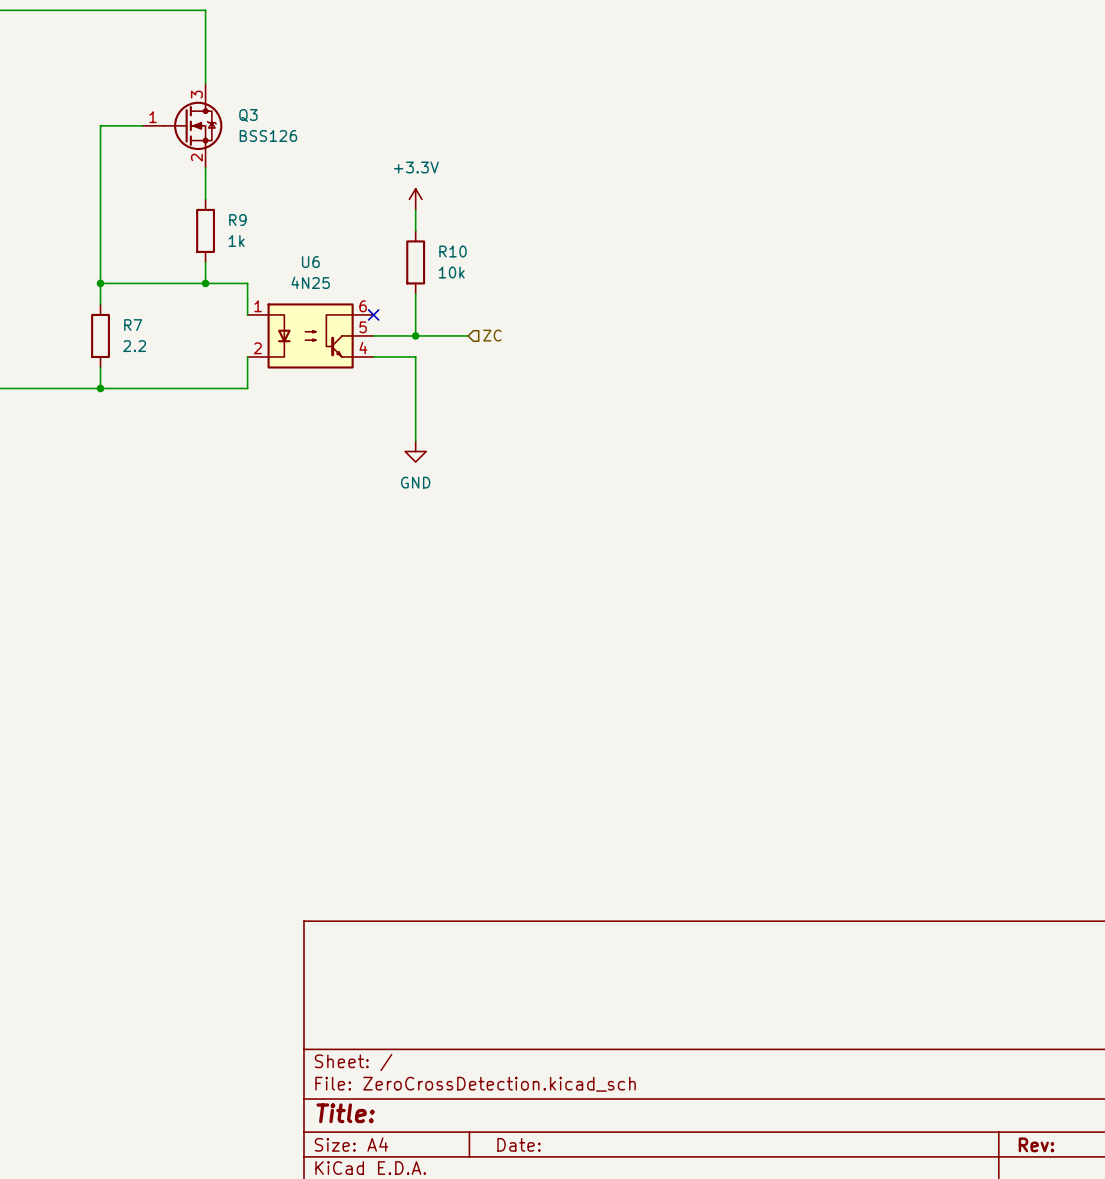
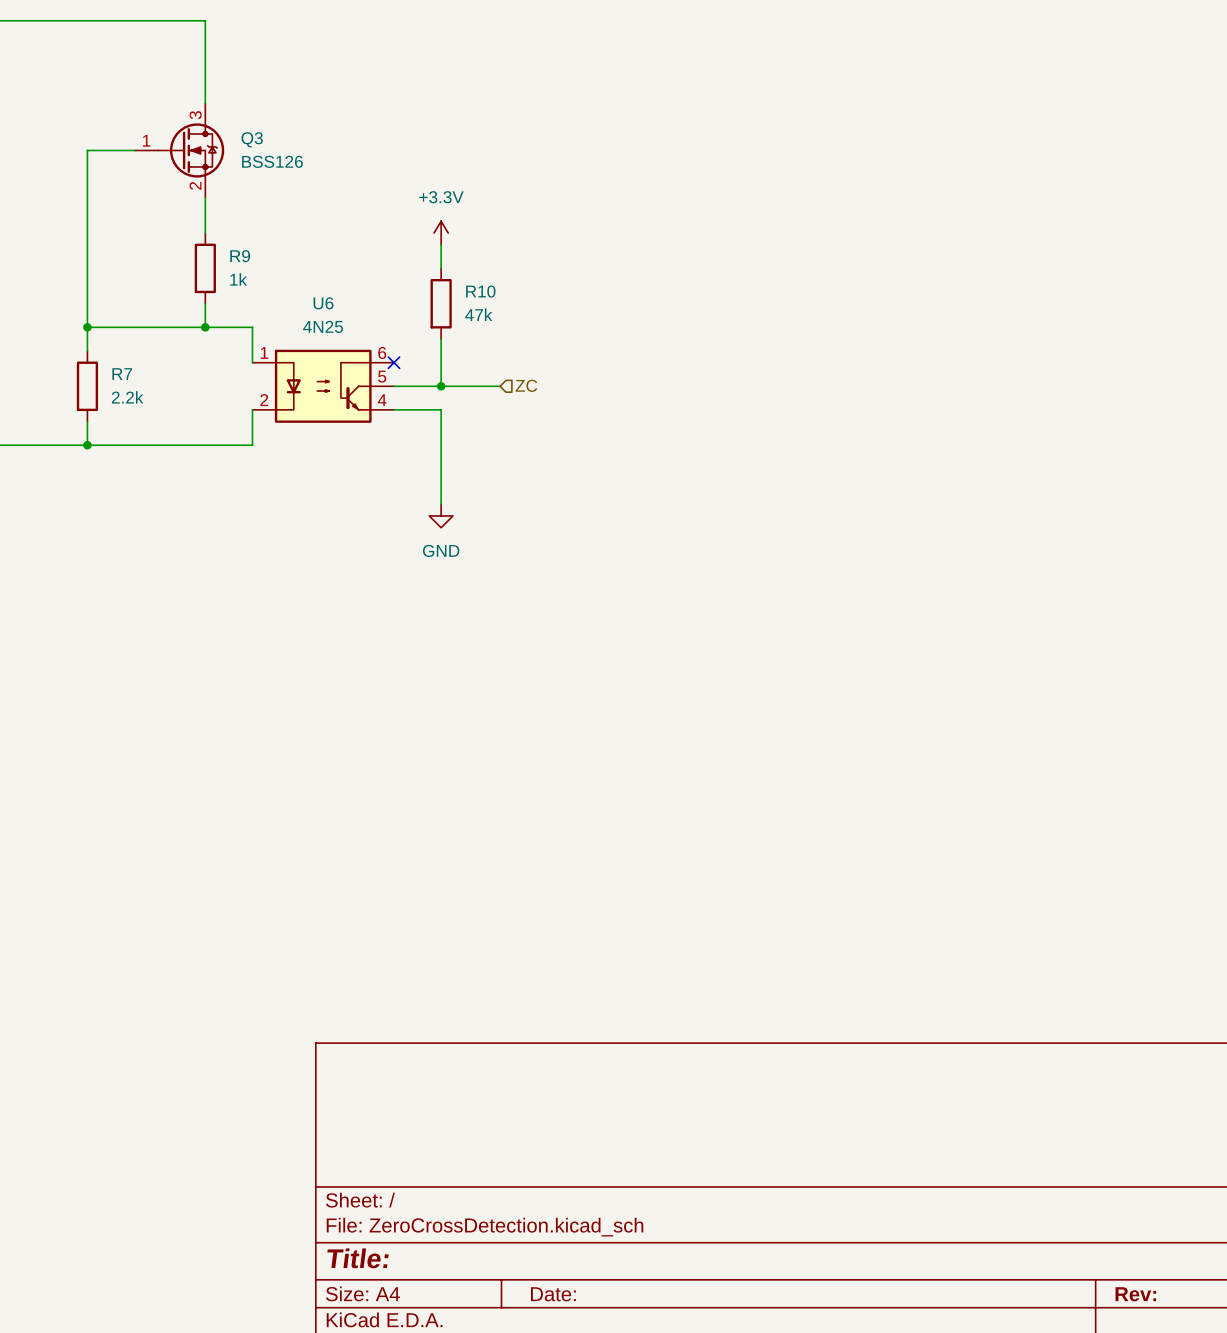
R10 value: 10k (451, 272) -> 47k (478, 314)
R7 value: 2.2 (134, 346) -> 2.2k (127, 397)

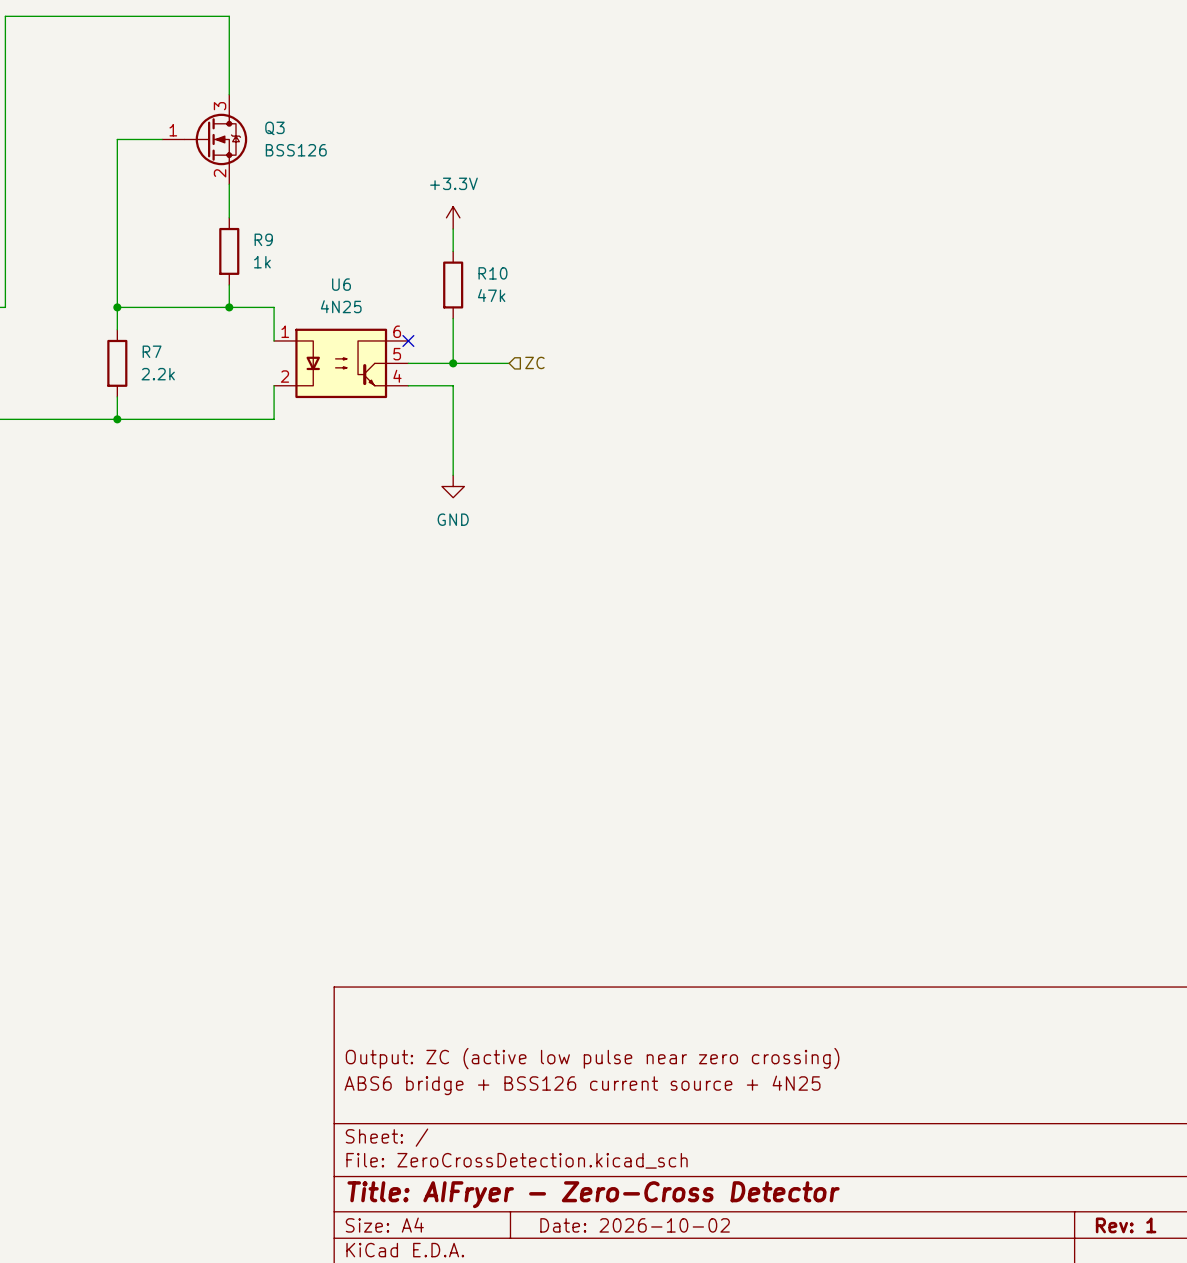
title block: none -> Output: ZC (active low pulse near zero crossing) (592, 1058)
title block: none -> ABS6 bridge + BSS126 current source + 4N25 (582, 1085)
title block: Title: (358, 1258) -> Title: AIFryer - Zero-Cross Detector (593, 1194)
title block: Date: (553, 1294) -> Date: 2026-10-02 (635, 1225)
title block: Rev: (1135, 1294) -> Rev: 1 (1126, 1225)

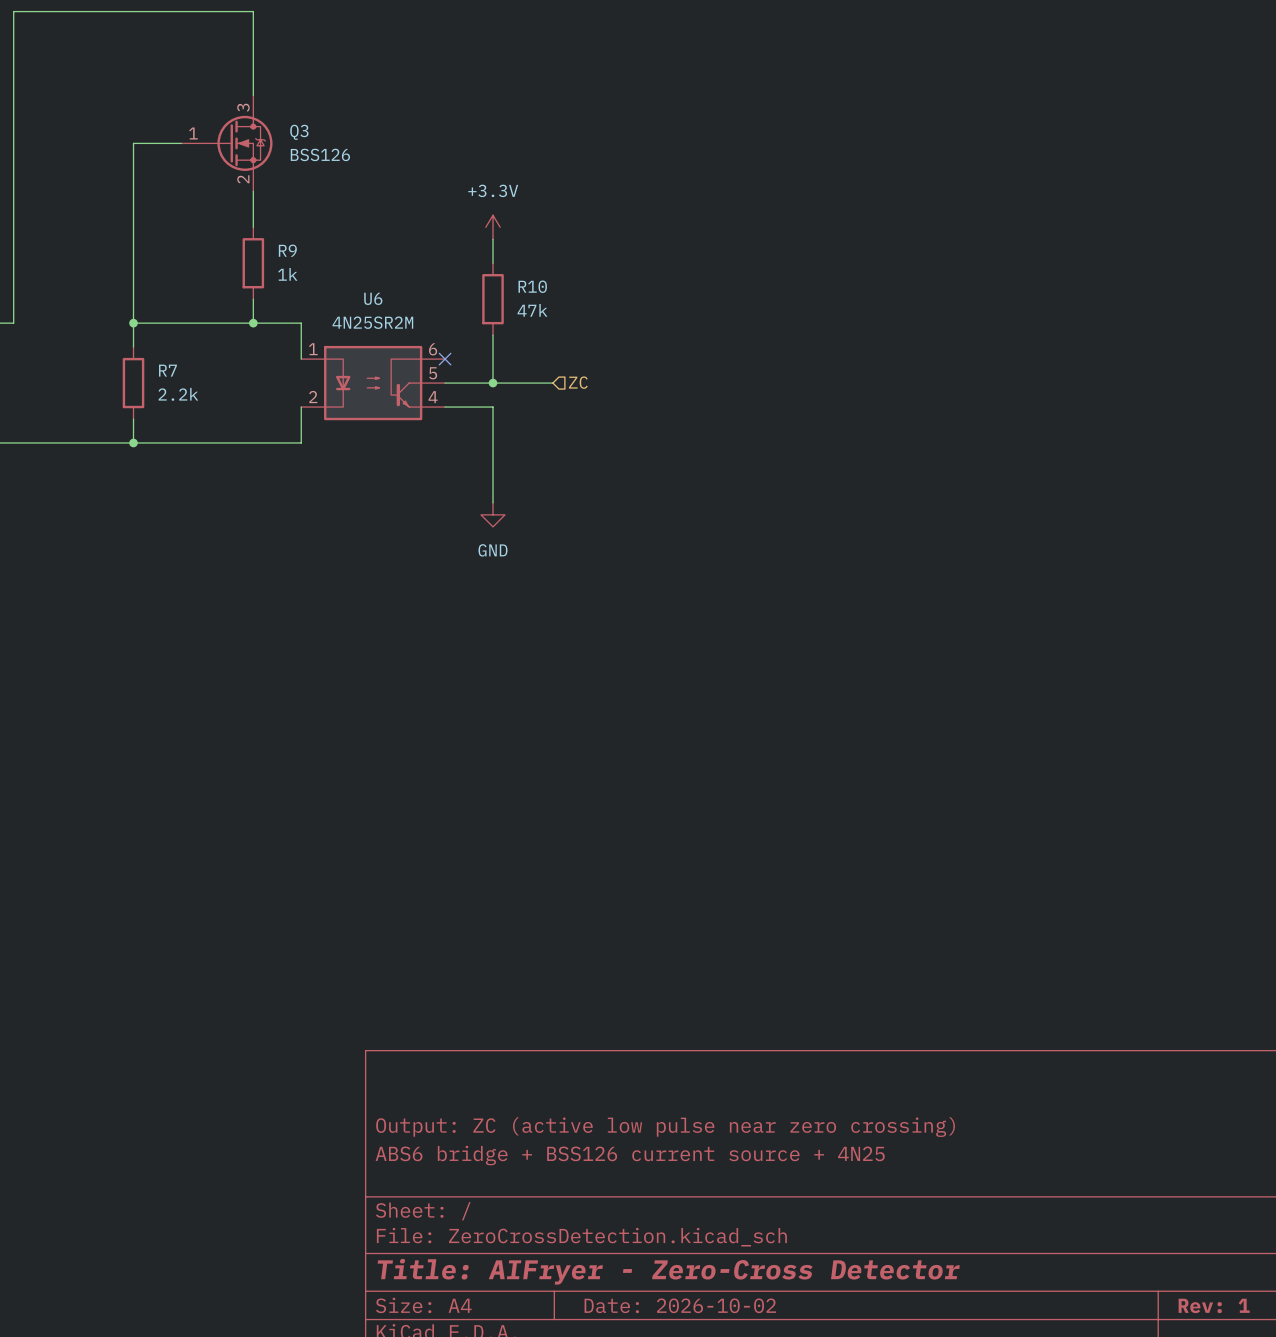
U6 value: 4N25 (341, 306) -> 4N25SR2M (372, 322)

